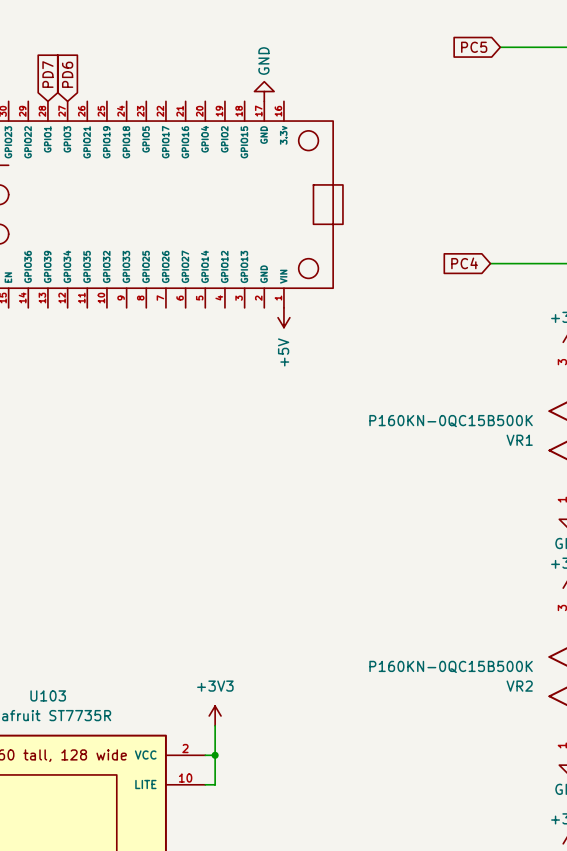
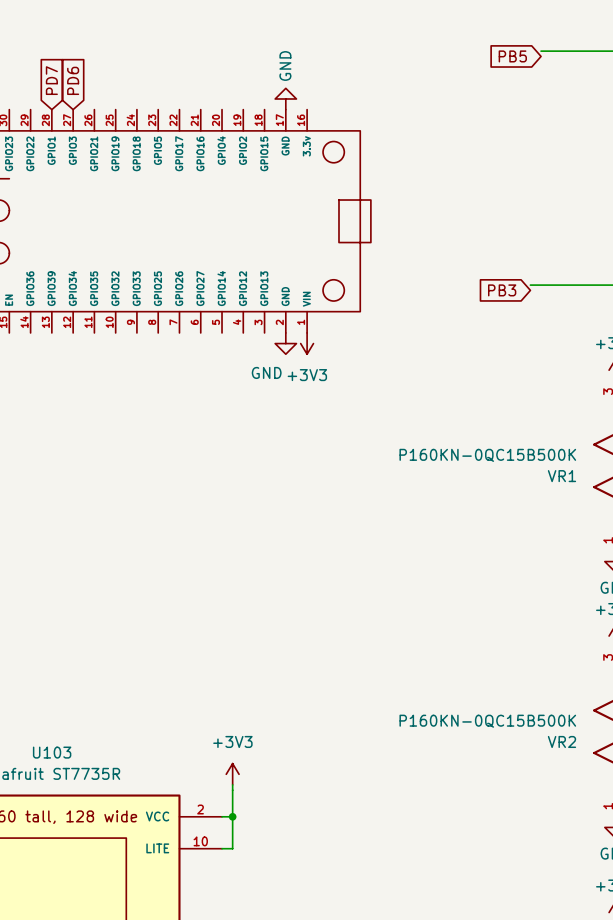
global label: PC5 (474, 47) -> PB5 (512, 56)
global label: PC4 (464, 263) -> PB3 (502, 290)
power symbol: none -> GND (285, 343)
power symbol: +5V (283, 317) -> +3V3 (307, 343)

